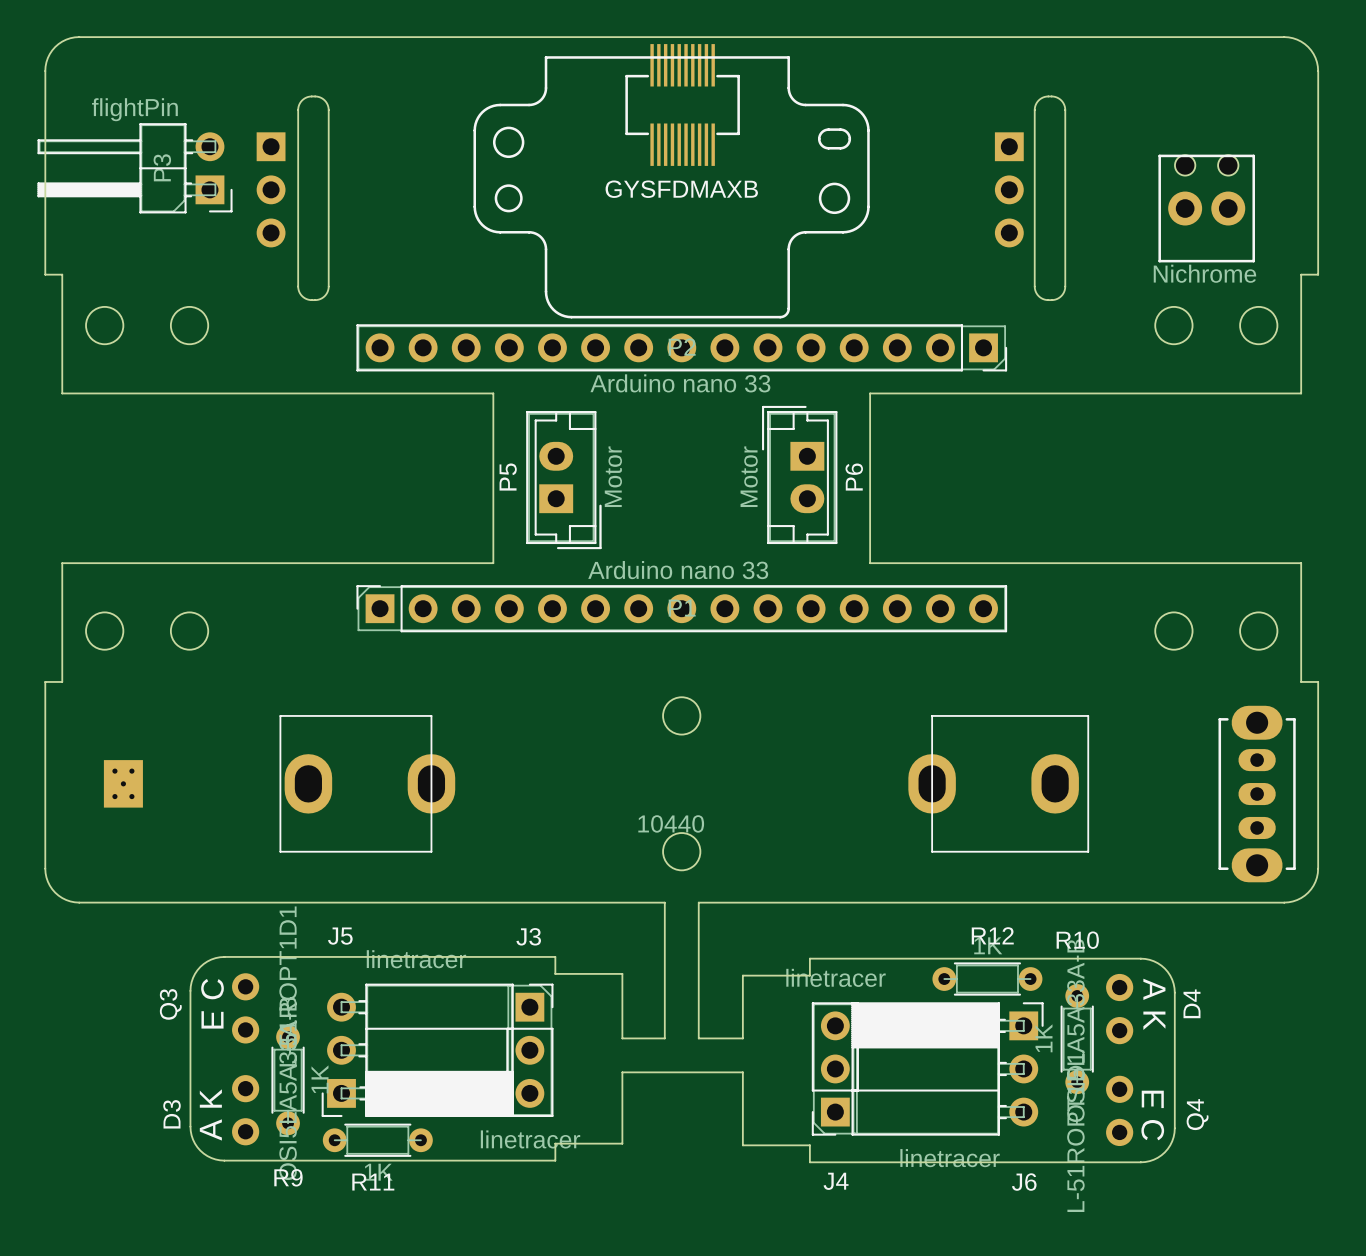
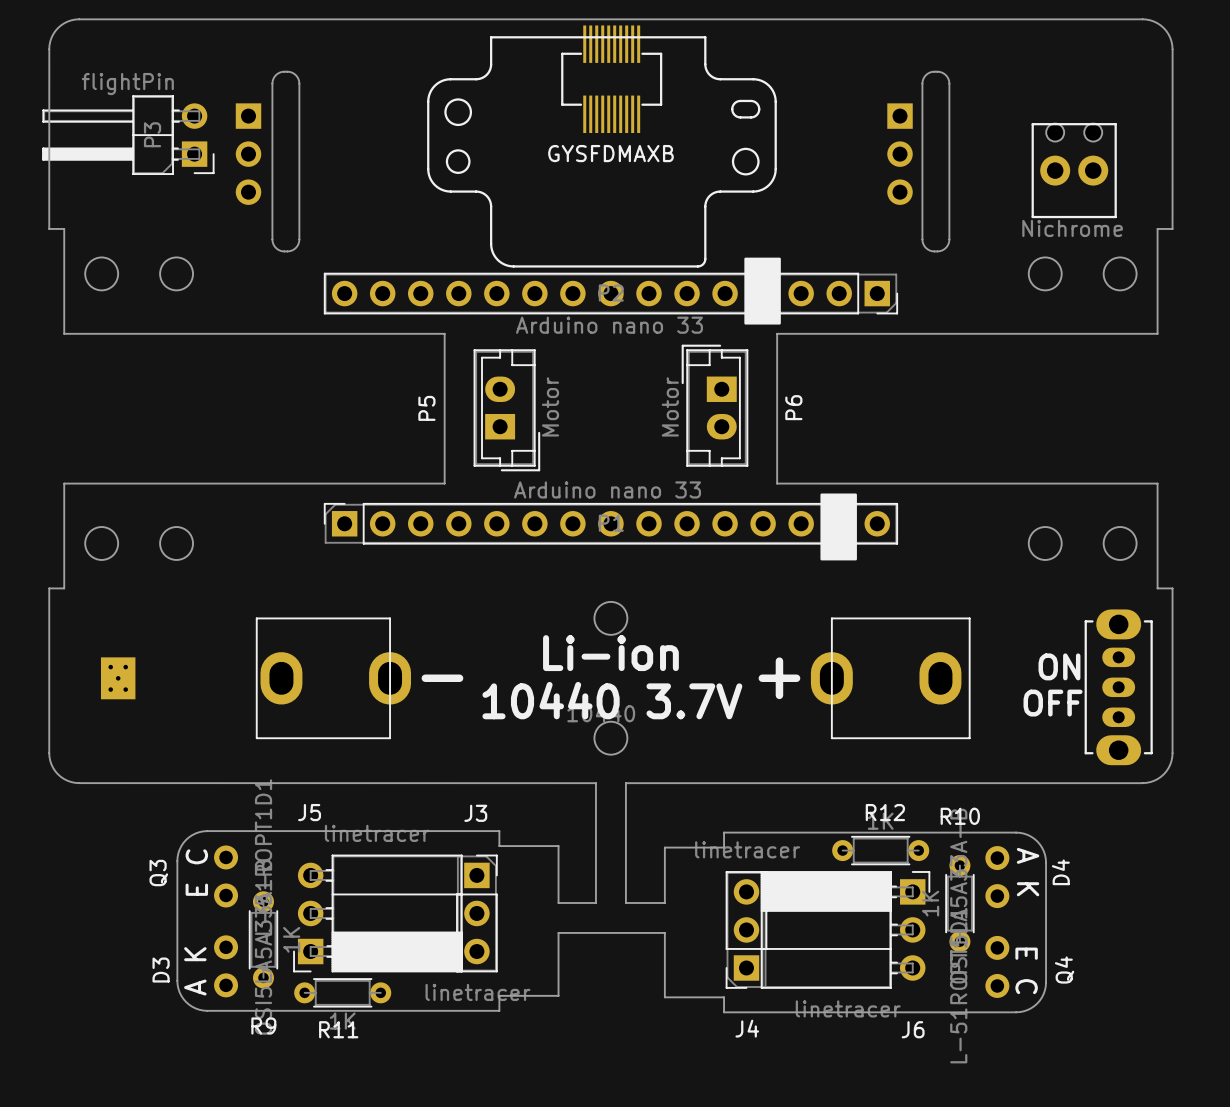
drawing: none -> [744, 257, 781, 325]
P5 name position: P5 (508, 477) -> P5 (426, 408)
P6 name position: P6 (854, 477) -> P6 (793, 407)
drawing: none -> [820, 493, 857, 561]
text: none -> Li-ion (610, 653)
text: none -> ON (1059, 666)
text: none -> + (779, 678)
text: none -> - (442, 678)
text: none -> 10440 3.7V (612, 700)
text: none -> OFF (1053, 703)

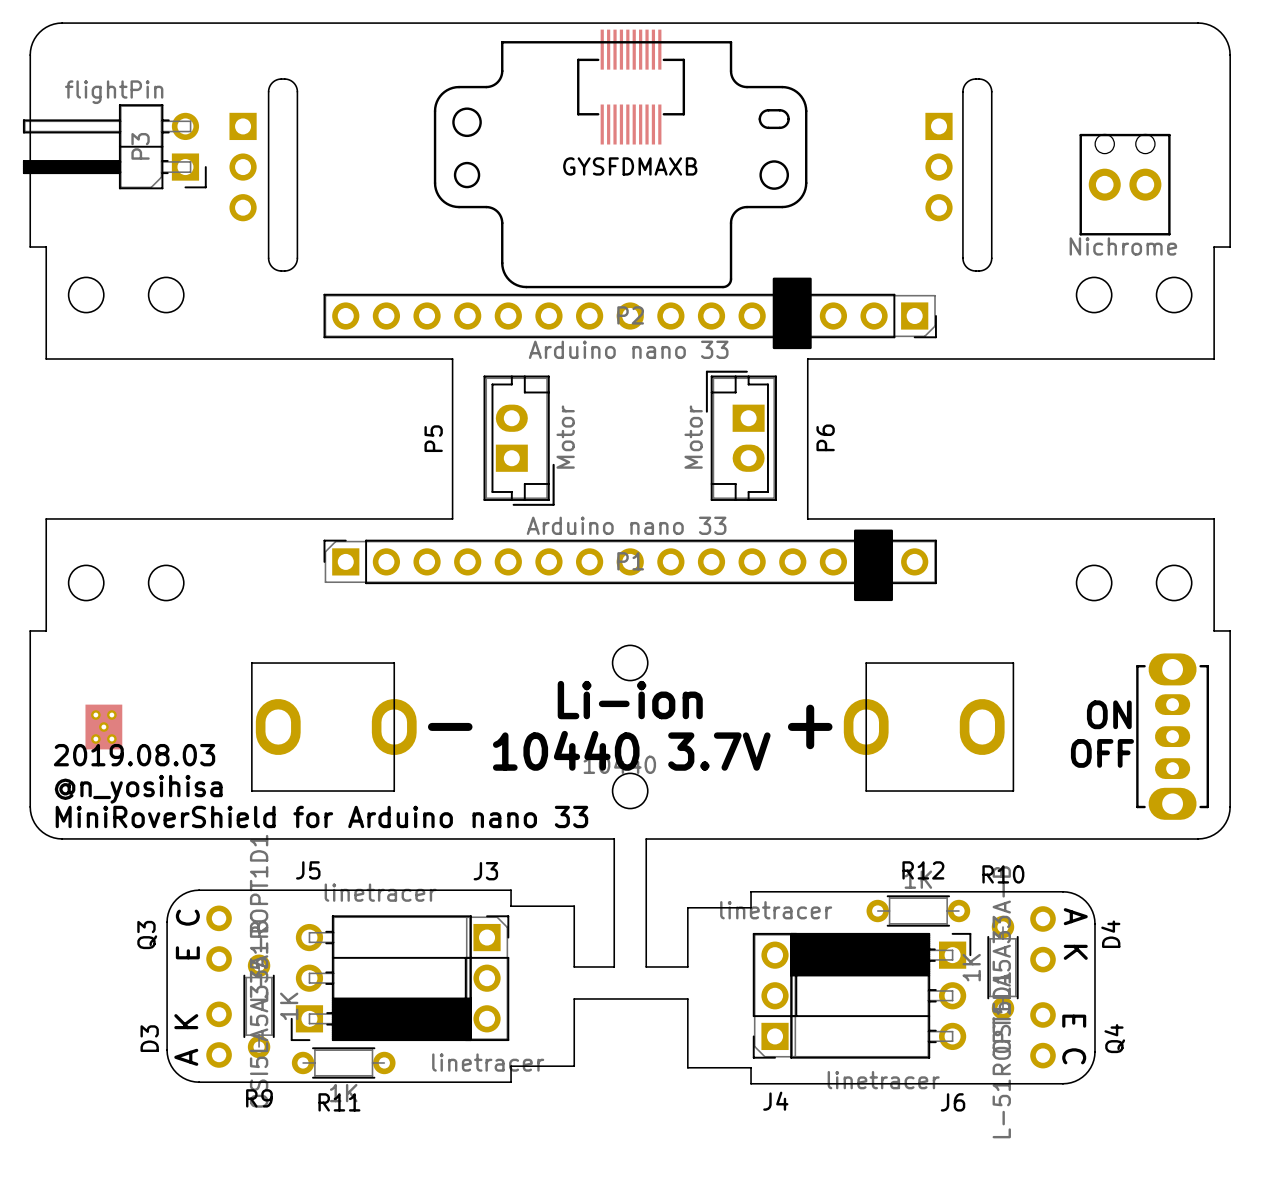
text: none -> 2019.08.03 (134, 755)
text: none -> @n_yosihisa (138, 789)
text: none -> MiniRoverShield for Arduino nano 33 (321, 816)

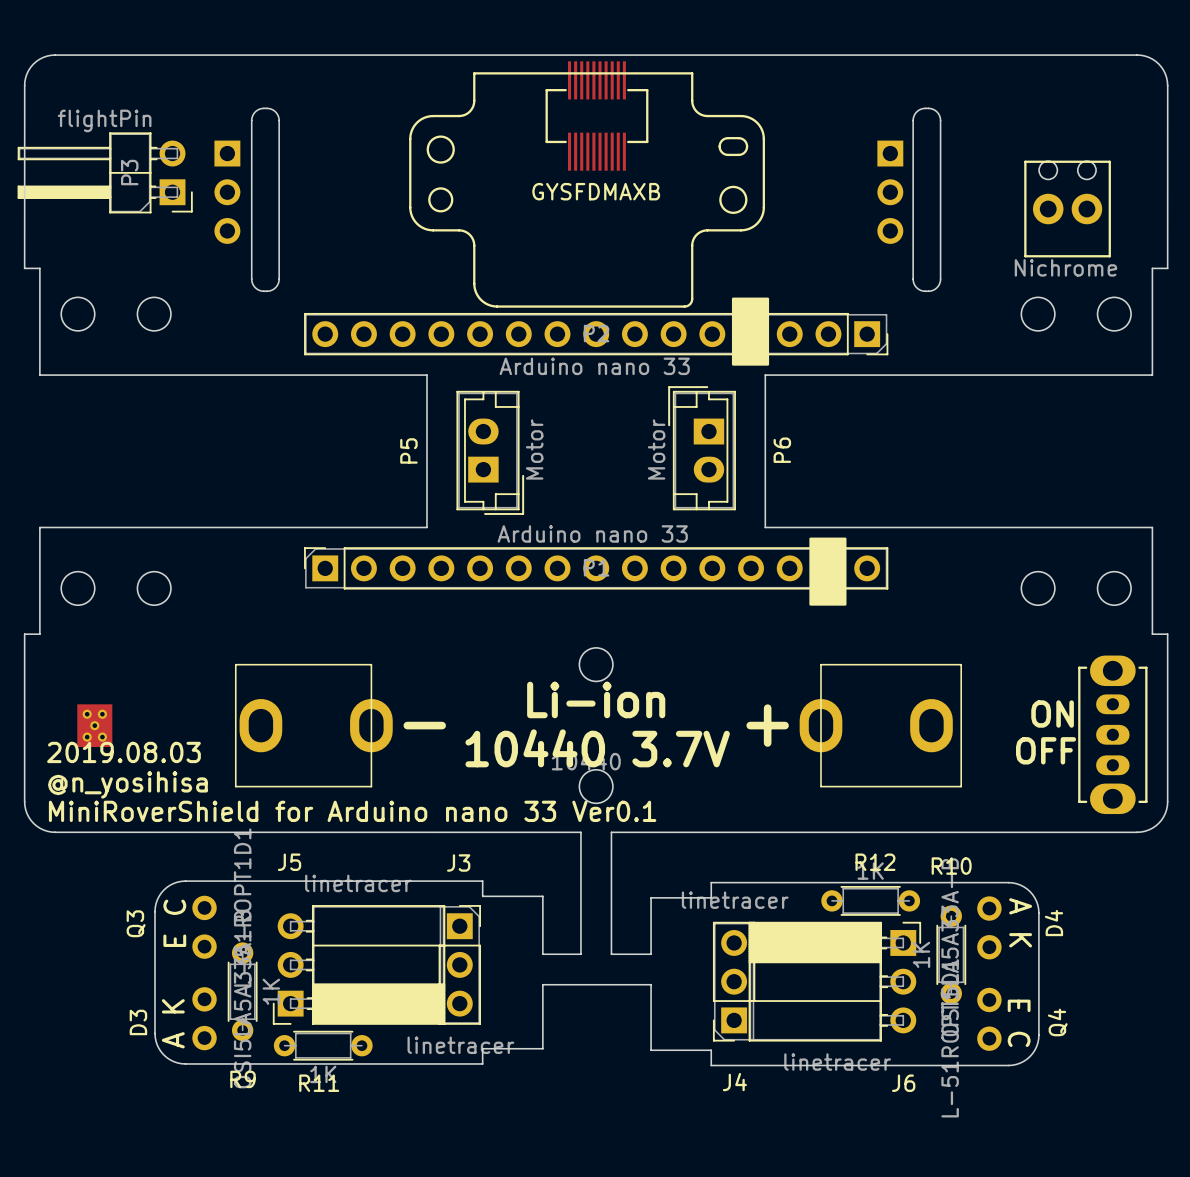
text: MiniRoverShield for Arduino nano 33 (321, 816) -> MiniRoverShield for Arduino nano 33 Ver0.1 (352, 811)

